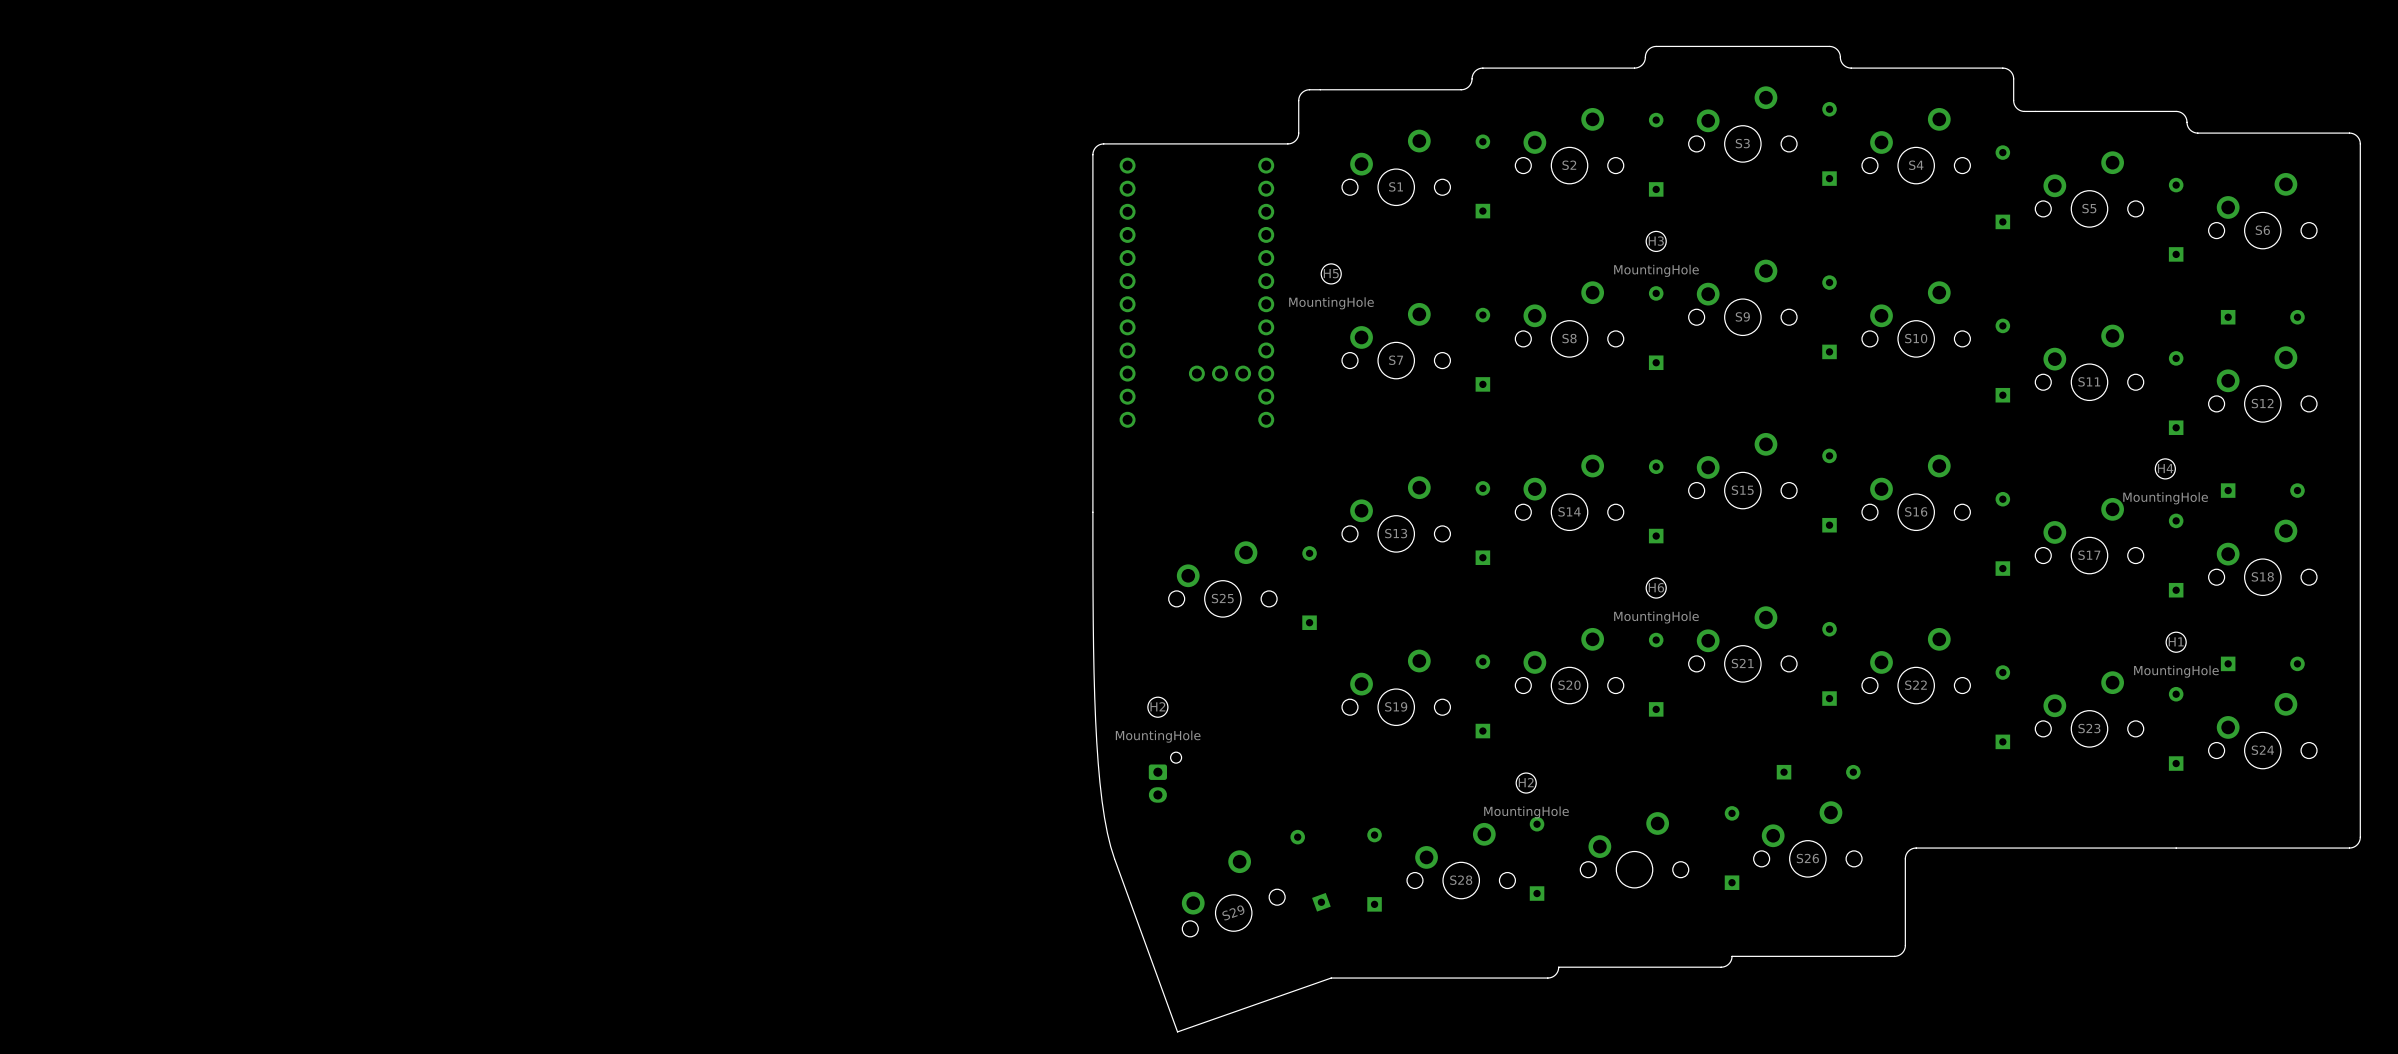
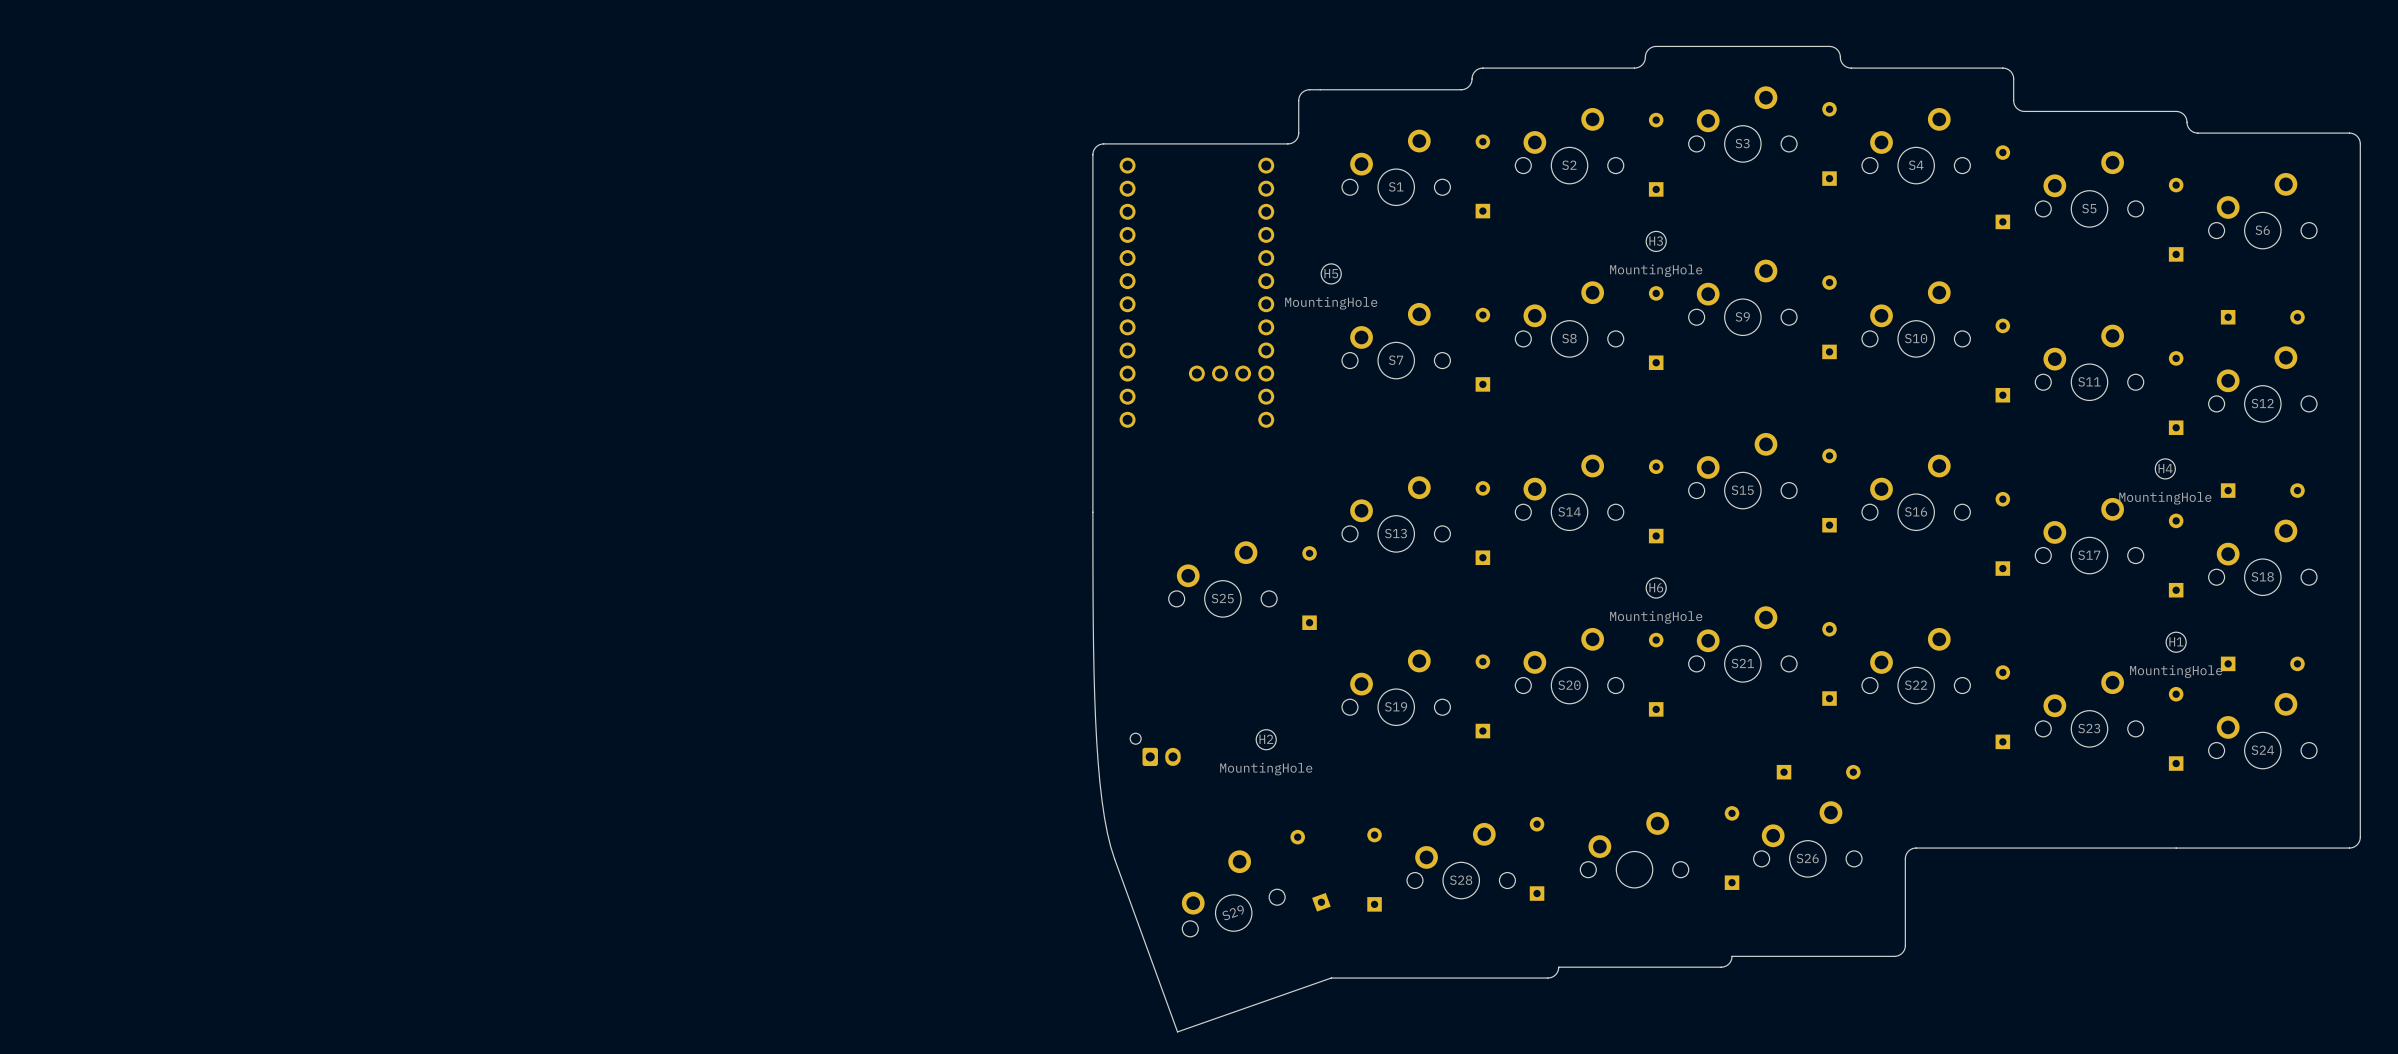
H2 position: (1157, 707) -> (1266, 739)
part rotation: 0° (1165, 777) -> 90° counterclockwise (1155, 749)
H2: MountingHole (1526, 783) -> none

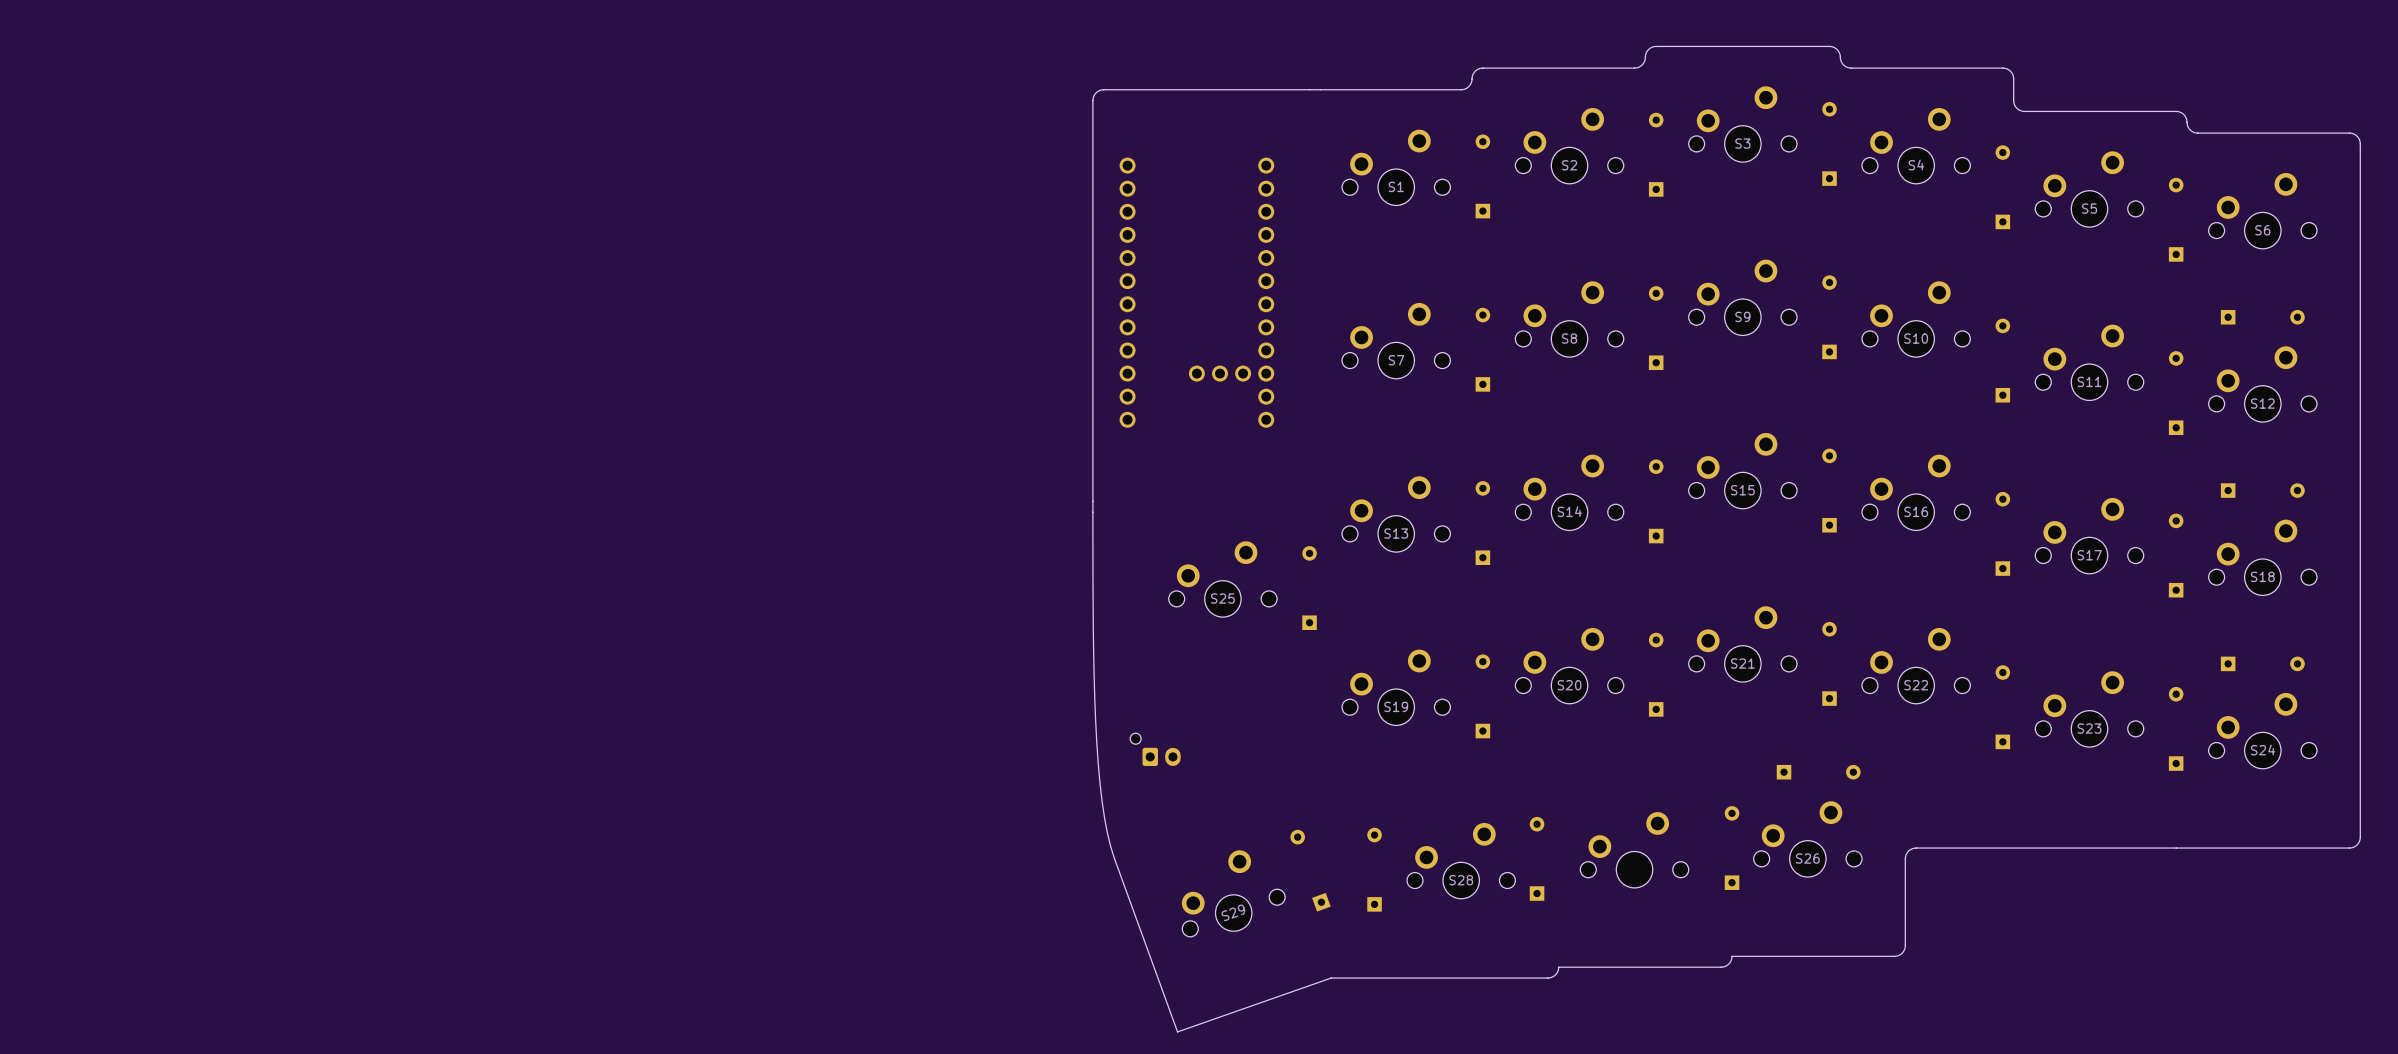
board edge: (1309, 89) (1302, 92) (1299, 96) (1298, 134) (1295, 140) (1290, 143) (1103, 143) (1096, 147) (1092, 154) -> (1309, 89) (1100, 90) (1095, 93) (1093, 99) (1092, 154)
H3: MountingHole (1656, 241) -> none
H5: MountingHole (1331, 273) -> none
H4: MountingHole (2165, 468) -> none
H6: MountingHole (1656, 588) -> none
H1: MountingHole (2176, 642) -> none
H2: MountingHole (1266, 739) -> none

